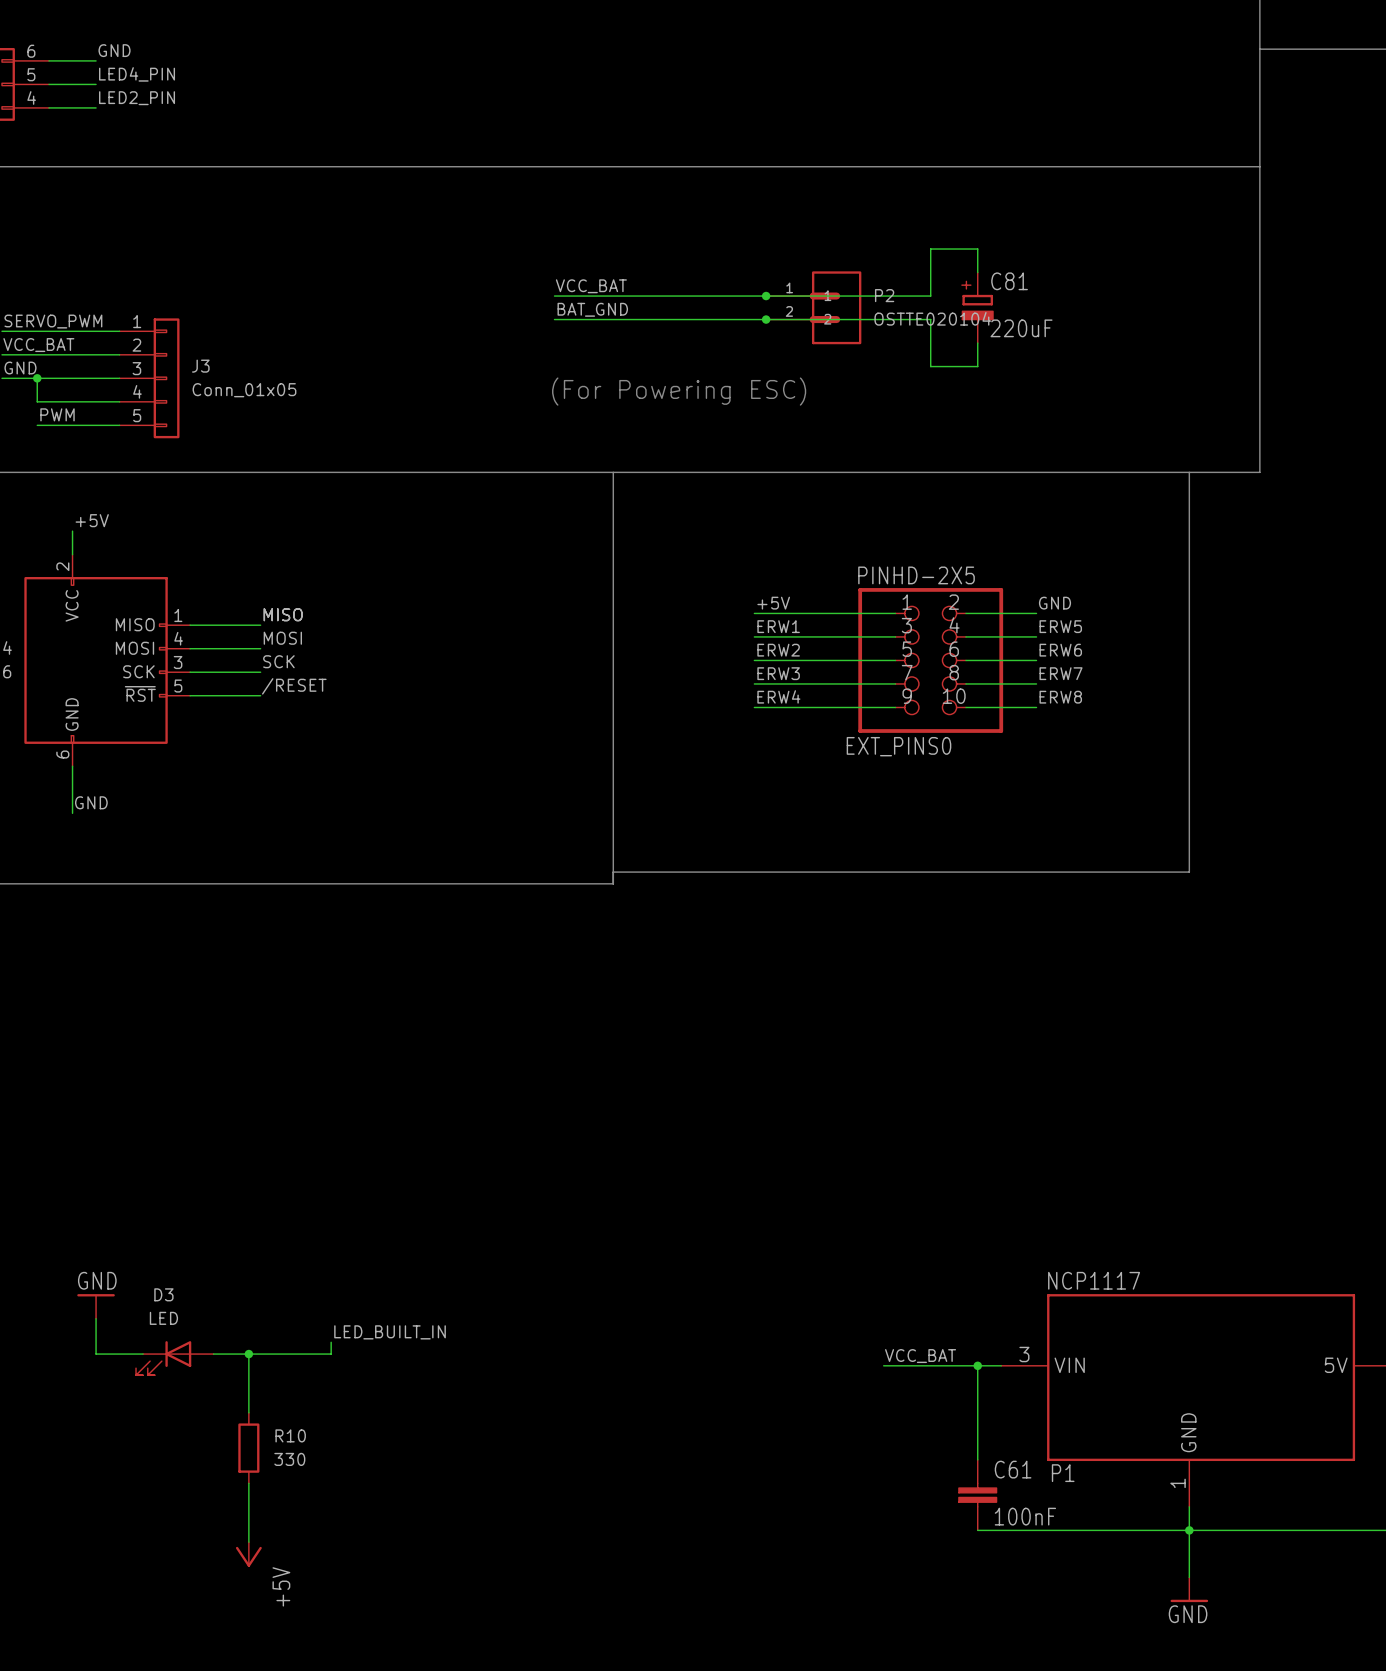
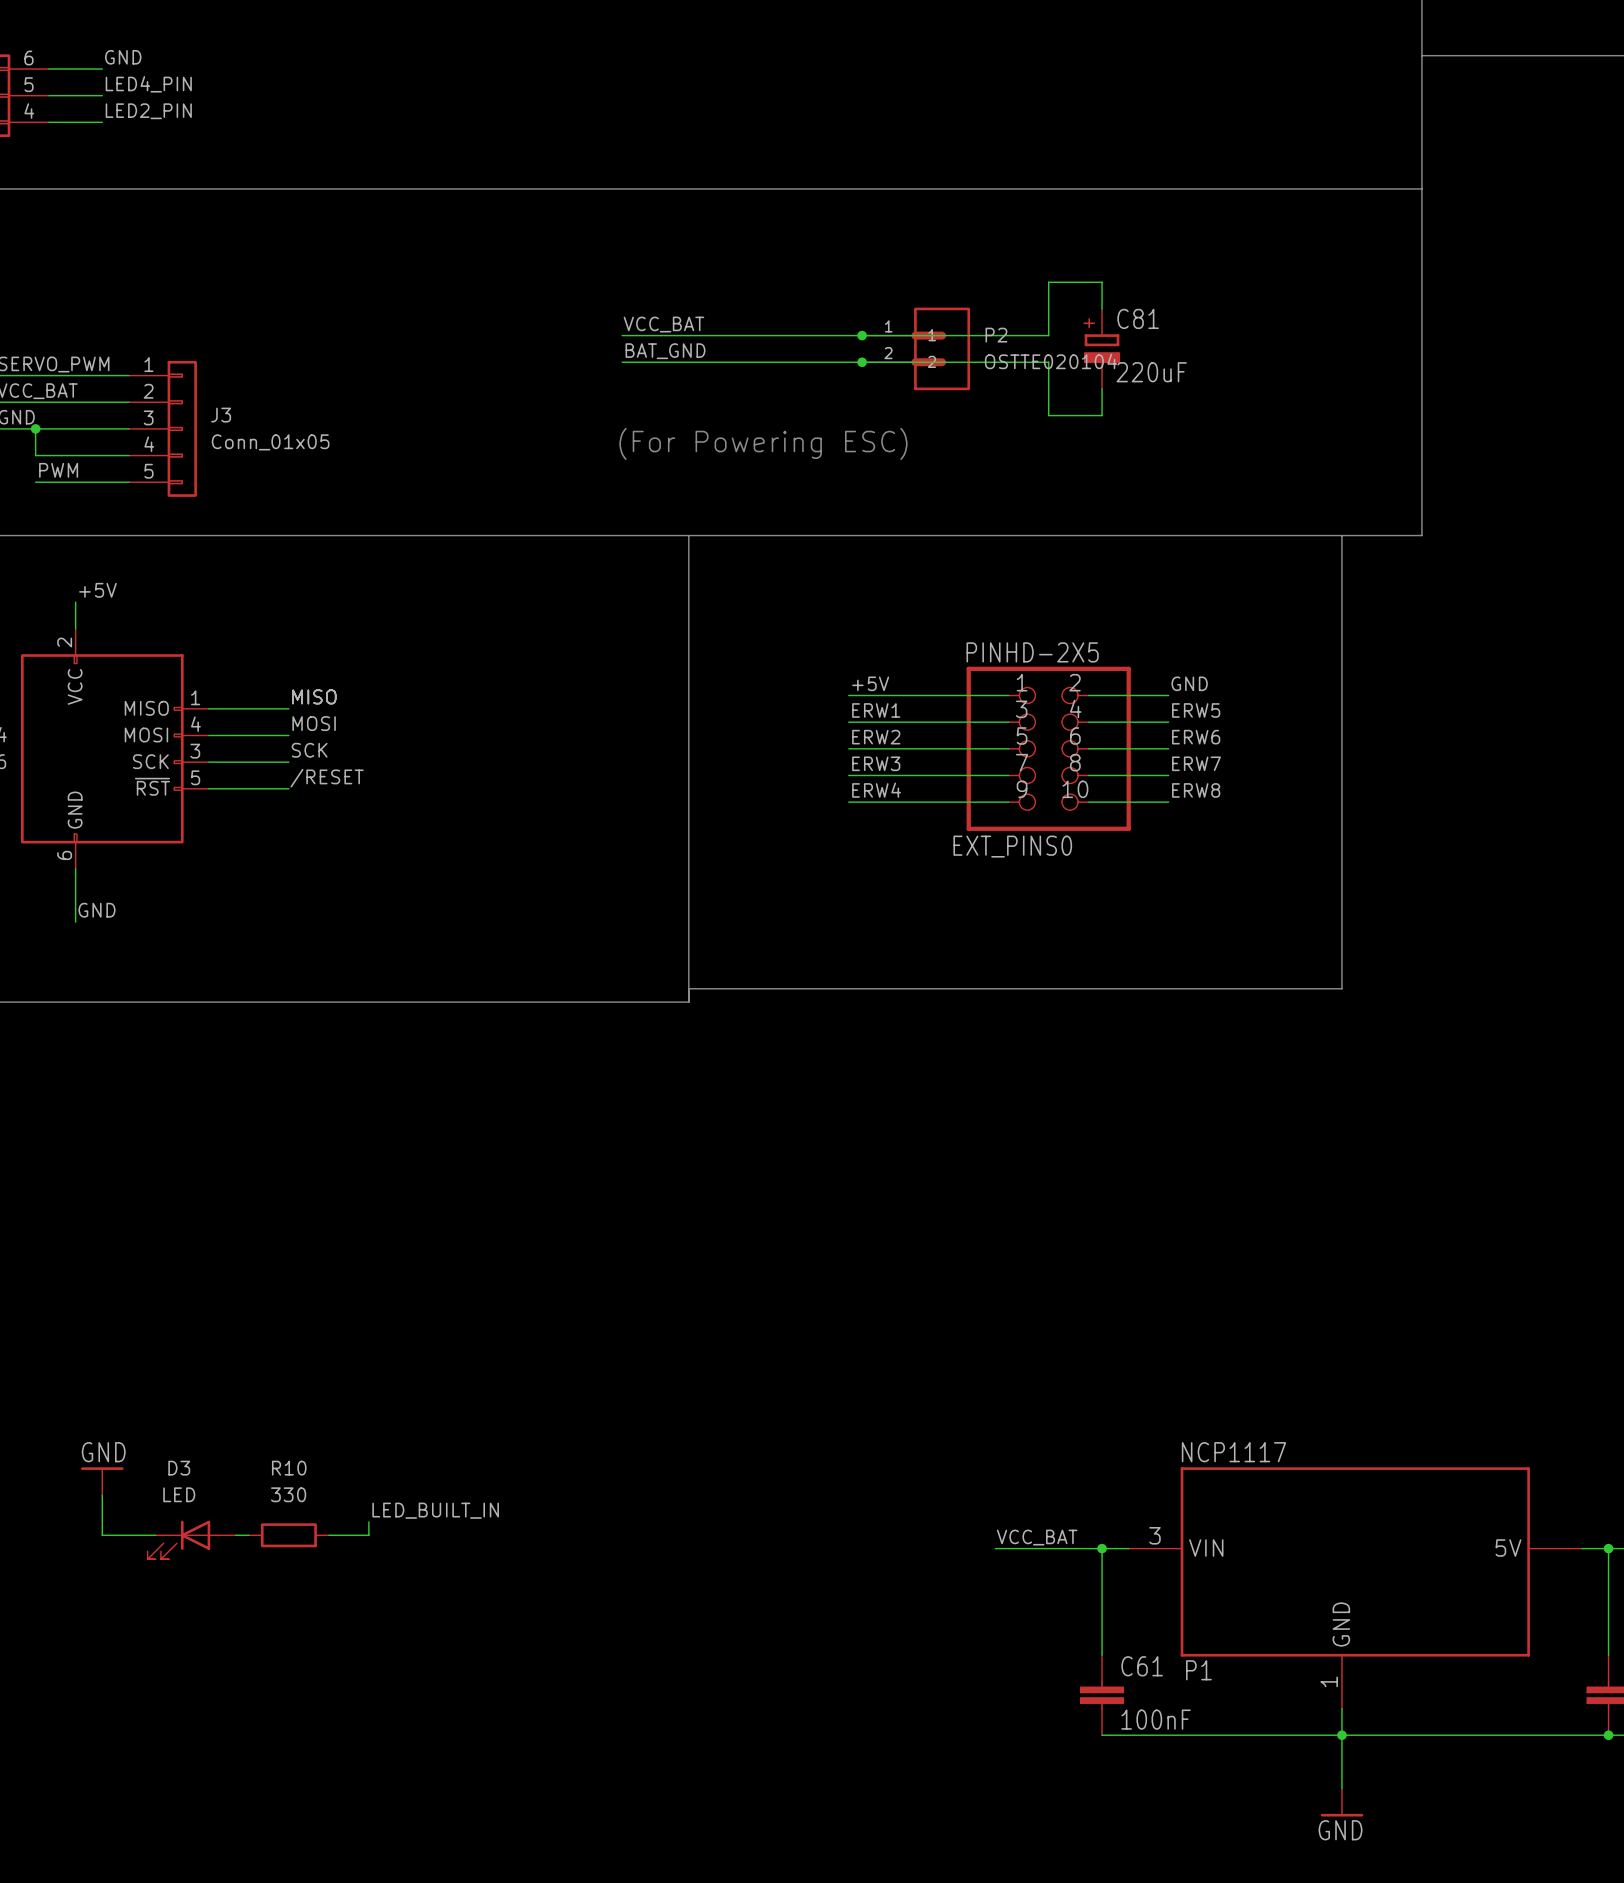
wire: (225, 1354) (295, 1354) -> none
wire: (248, 1354) (248, 1412) -> none
junction: (248, 1354) -> none
R10 name position: R10 (290, 1435) -> R10 (289, 1468)
R10 rotation: 0° (248, 1448) -> 90° clockwise (288, 1535)
R10 position: (248, 1448) -> (288, 1535)
R10 value position: 330 (289, 1459) -> 330 (288, 1494)
wire: (248, 1483) (248, 1542) -> none
power symbol: +5V (248, 1554) -> none

